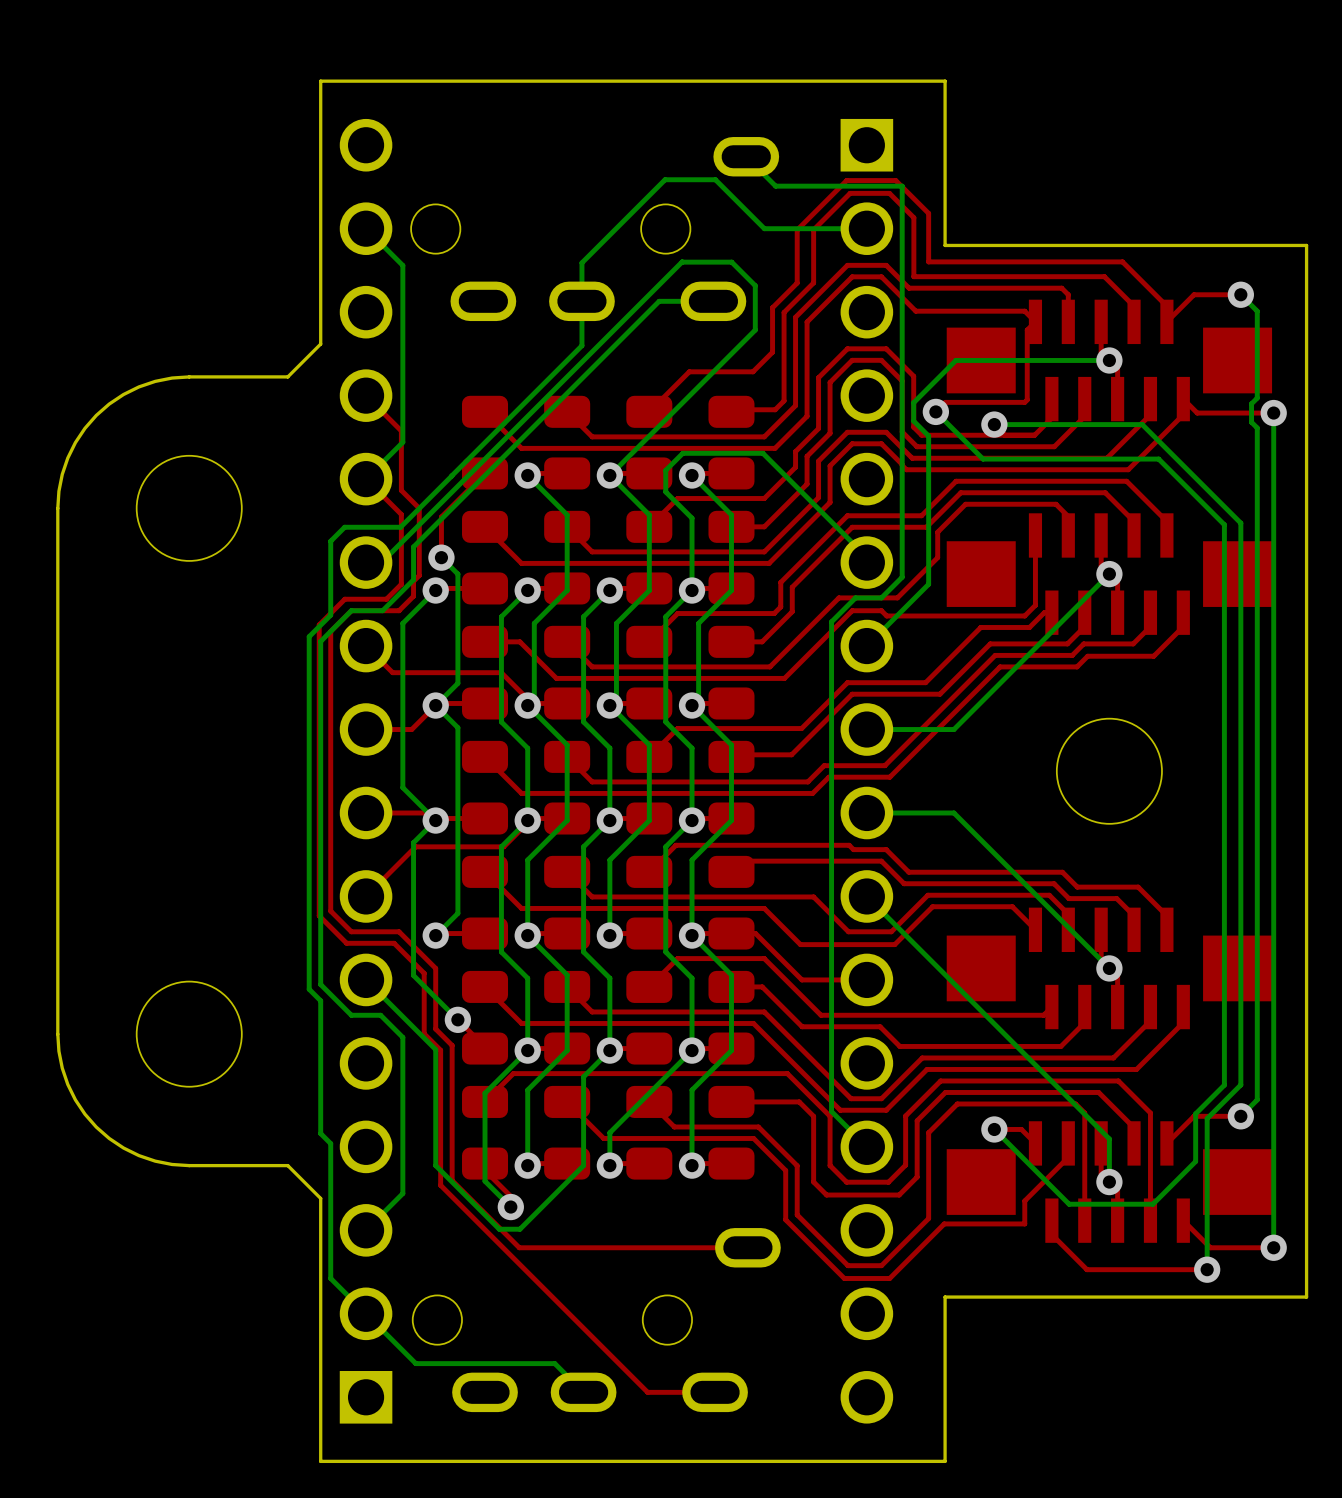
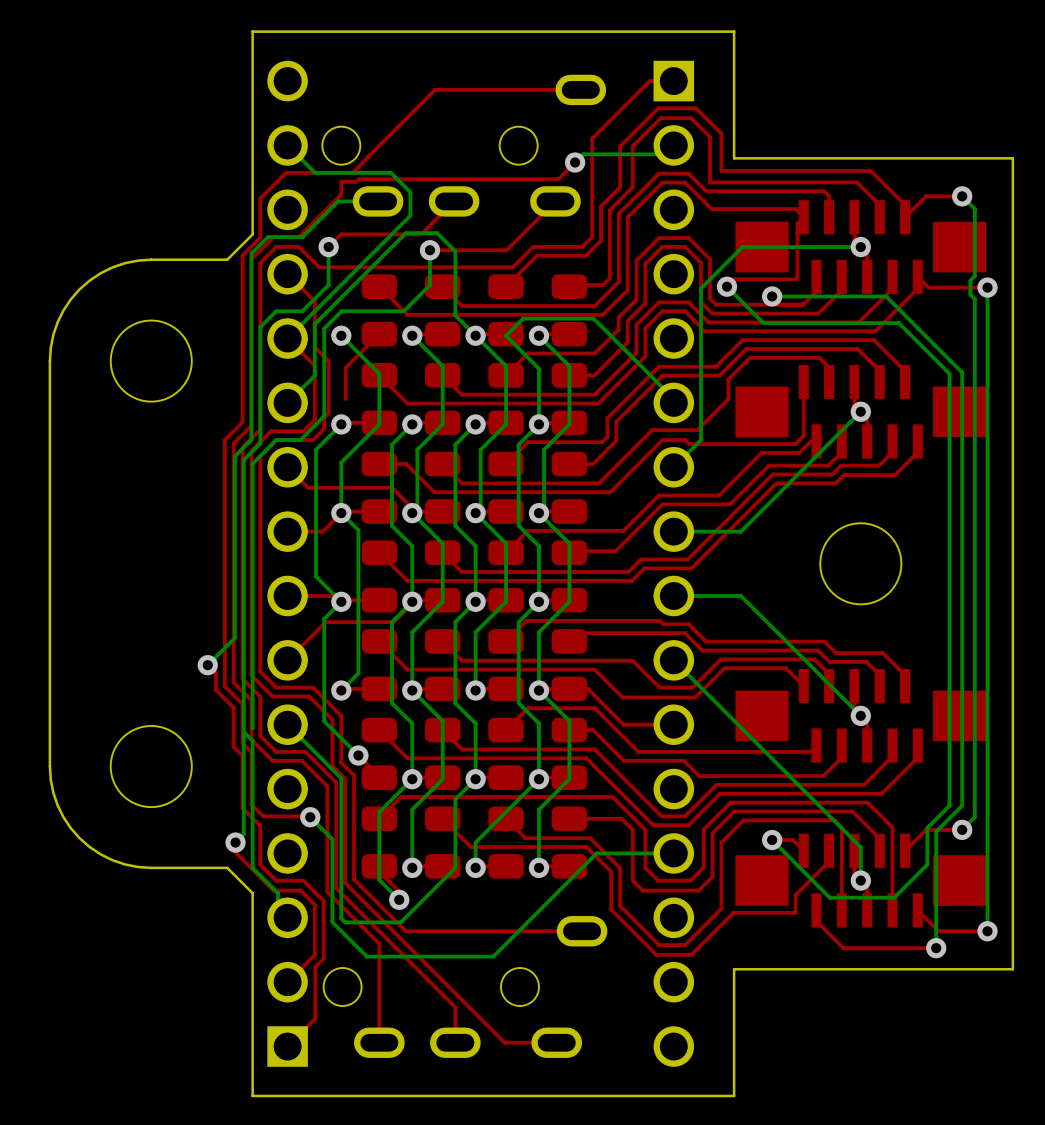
top track: none -> (673, 81) (649, 81) (592, 138) (592, 236) (582, 246) (533, 246) (512, 267) (319, 267) (298, 246) (276, 246) (260, 262) (260, 429) (242, 447) (242, 678) (260, 696) (260, 736) (276, 751) (305, 751) (336, 782) (336, 888) (455, 1007) (455, 1042)
top track: none -> (580, 89) (435, 89) (352, 172) (285, 172) (260, 198) (260, 237) (242, 255) (242, 422) (224, 439) (224, 686) (242, 704) (242, 743) (251, 752) (251, 804) (263, 816) (310, 817)
bottom track: (746, 156) (775, 186) (902, 186) (902, 414) -> (709, 279) (701, 288)
bottom track: (866, 228) (764, 228) (715, 179) (665, 179) (581, 262) (581, 345) (451, 475) -> none
bottom track: none -> (673, 154) (583, 154) (575, 162)
top track: none -> (575, 162) (558, 179) (358, 179) (356, 181) (341, 181) (341, 194) (298, 237) (273, 237) (251, 259) (251, 425) (233, 443) (233, 682) (251, 700) (251, 739) (272, 760) (301, 760) (327, 786) (327, 891) (379, 943) (379, 1042)
via: none -> (575, 162)
bottom track: (682, 261) (381, 562) (366, 562) -> (475, 335) (455, 315) (455, 251) (437, 233) (405, 233) (314, 324) (314, 375) (287, 402)
bottom track: (682, 262) (731, 262) (755, 285) (755, 330) (609, 475) -> none
bottom track: (401, 264) (402, 442) -> (315, 172) (391, 172) (410, 192) (410, 215) (315, 310)
bottom track: none -> (378, 201) (338, 201) (302, 237) (267, 237) (251, 253) (251, 439) (234, 456) (234, 638) (207, 665)
top track: none -> (454, 201) (421, 234) (341, 234) (328, 247)
top track: none -> (555, 201) (506, 250) (429, 250)
bottom track: (713, 301) (659, 301) (550, 409) -> (429, 250) (429, 285)
via: none -> (328, 247)
via: none -> (429, 250)
bottom track: (913, 402) (913, 421) (928, 436) (928, 584) (902, 610) -> (701, 414) (701, 440)
bottom track: (516, 443) (413, 546) -> (403, 311) (341, 311) (324, 328) (324, 390)
bottom track: (682, 453) (665, 470) (665, 491) -> (531, 318) (523, 318) (506, 335) (518, 348)
bottom track: (451, 476) (400, 527) (344, 527) (330, 541) -> (328, 247) (328, 284) (302, 311) (276, 311) (260, 327) (260, 386)
bottom track: (441, 557) (457, 574) (457, 683) (435, 705) -> (341, 335) (379, 373) (379, 424) (341, 462) (341, 513)
via position: (441, 557) -> (341, 335)
bottom track: (902, 577) (881, 597) (855, 597) (831, 621) (831, 1111) (866, 1146) -> (310, 817) (332, 839) (332, 922) (366, 956) (493, 956) (596, 853) (673, 853)
top track: none -> (207, 665) (216, 673) (216, 690) (233, 707) (233, 747) (242, 755) (242, 808) (260, 825) (260, 864) (276, 880) (303, 880) (323, 900) (323, 958) (315, 966) (315, 1018) (287, 1046)
via: none -> (207, 665)
bottom track: (320, 984) (351, 1015) (380, 1015) (402, 1037) (402, 1193) (366, 1230) -> (252, 843) (252, 867) (277, 893) (277, 908) (287, 917)
bottom track: none -> (243, 731) (243, 834) (235, 842)
via: none -> (310, 817)
top track: none -> (235, 842) (235, 852) (273, 890) (300, 890) (314, 904) (314, 954) (287, 982)
via: none -> (235, 842)
bottom track: (320, 1133) (330, 1143) (330, 1278) (415, 1363) (554, 1363) (583, 1392) -> none
bottom track: (435, 1165) (499, 1229) (519, 1229) -> (341, 867) (341, 918) (345, 922) (400, 922) (406, 916)

